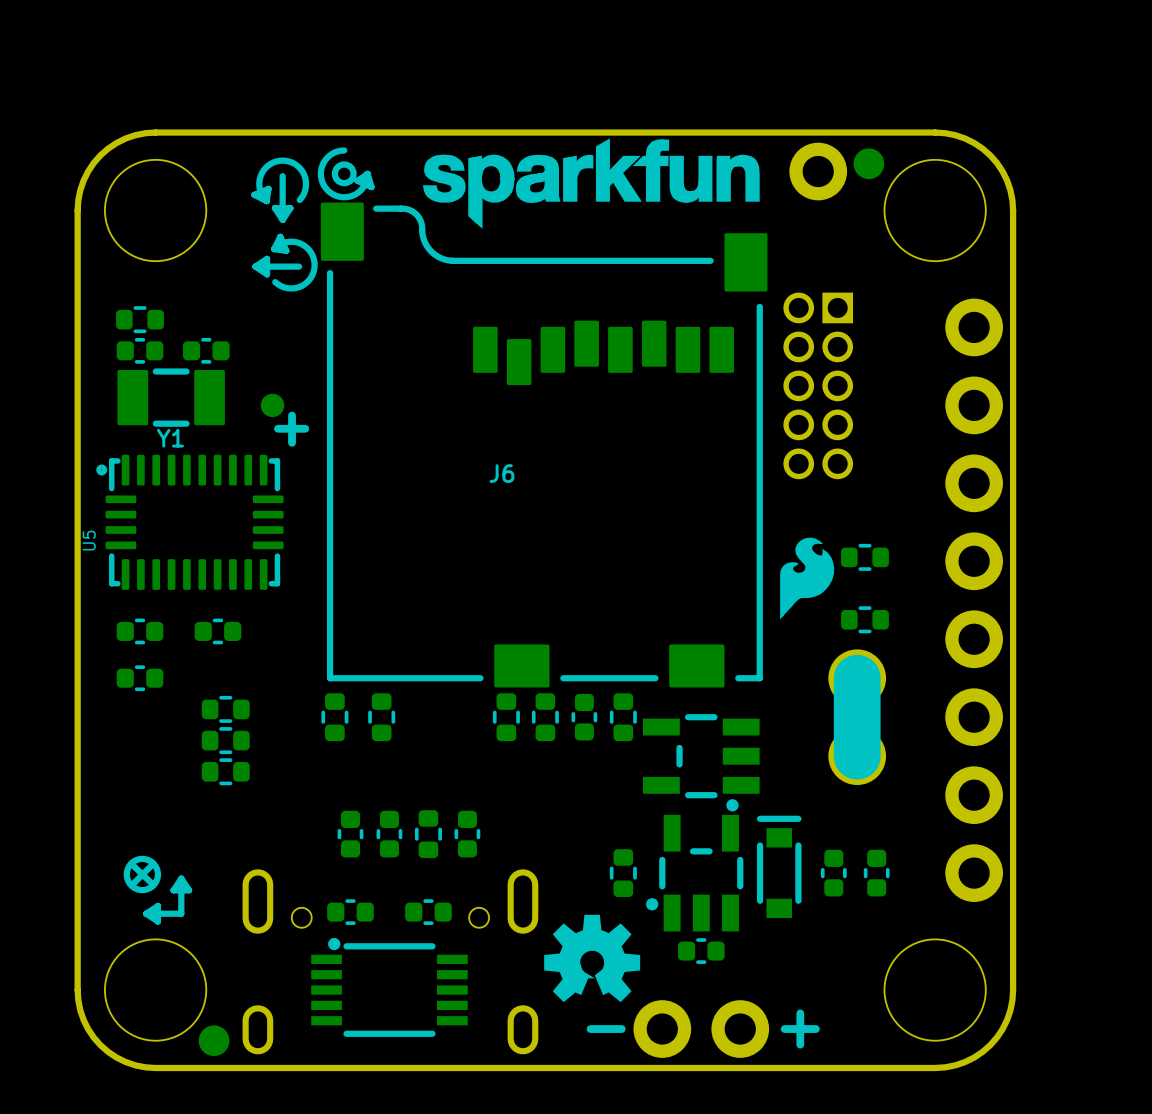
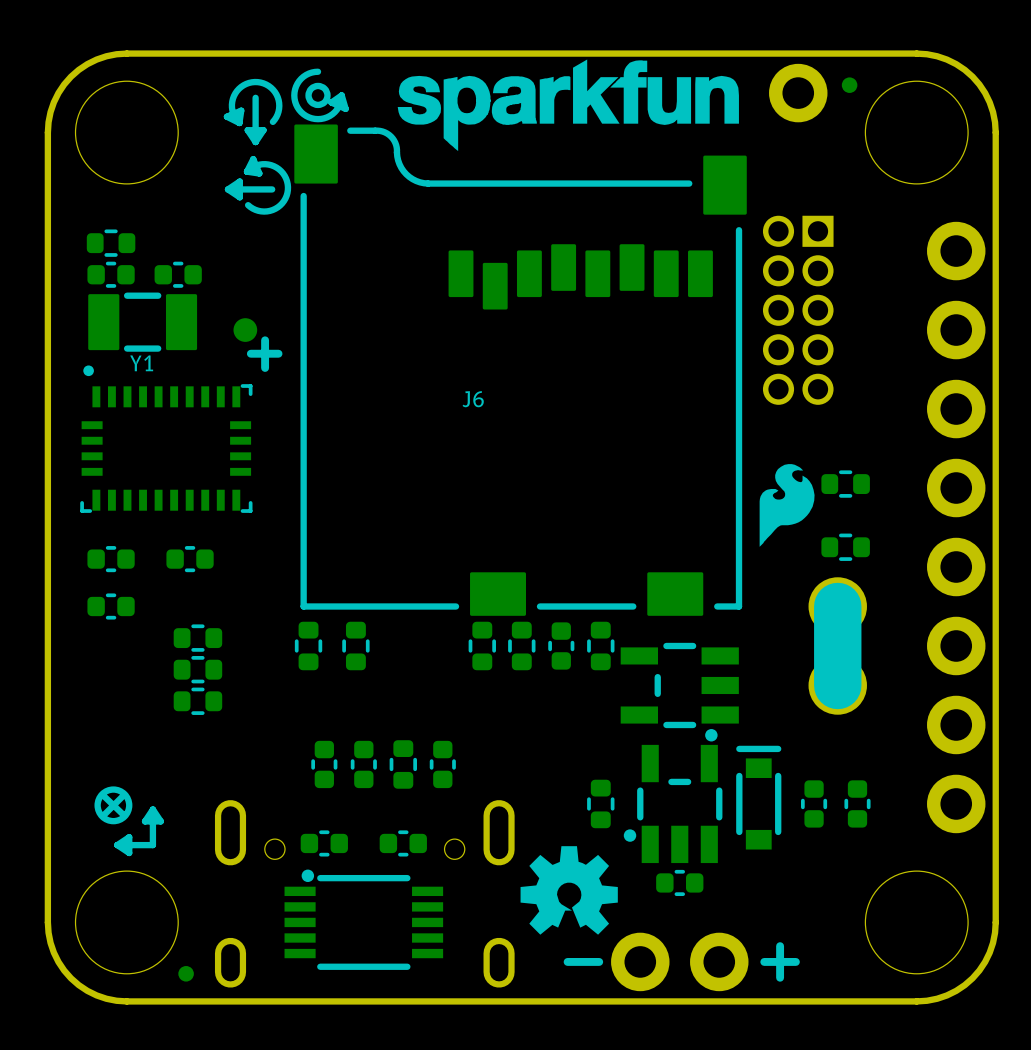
part footprint: [853, 148, 885, 180] -> [841, 77, 858, 93]
part: none -> (166, 439)
U5: (189, 522) -> none
part footprint: [198, 1025, 230, 1057] -> [178, 966, 194, 982]

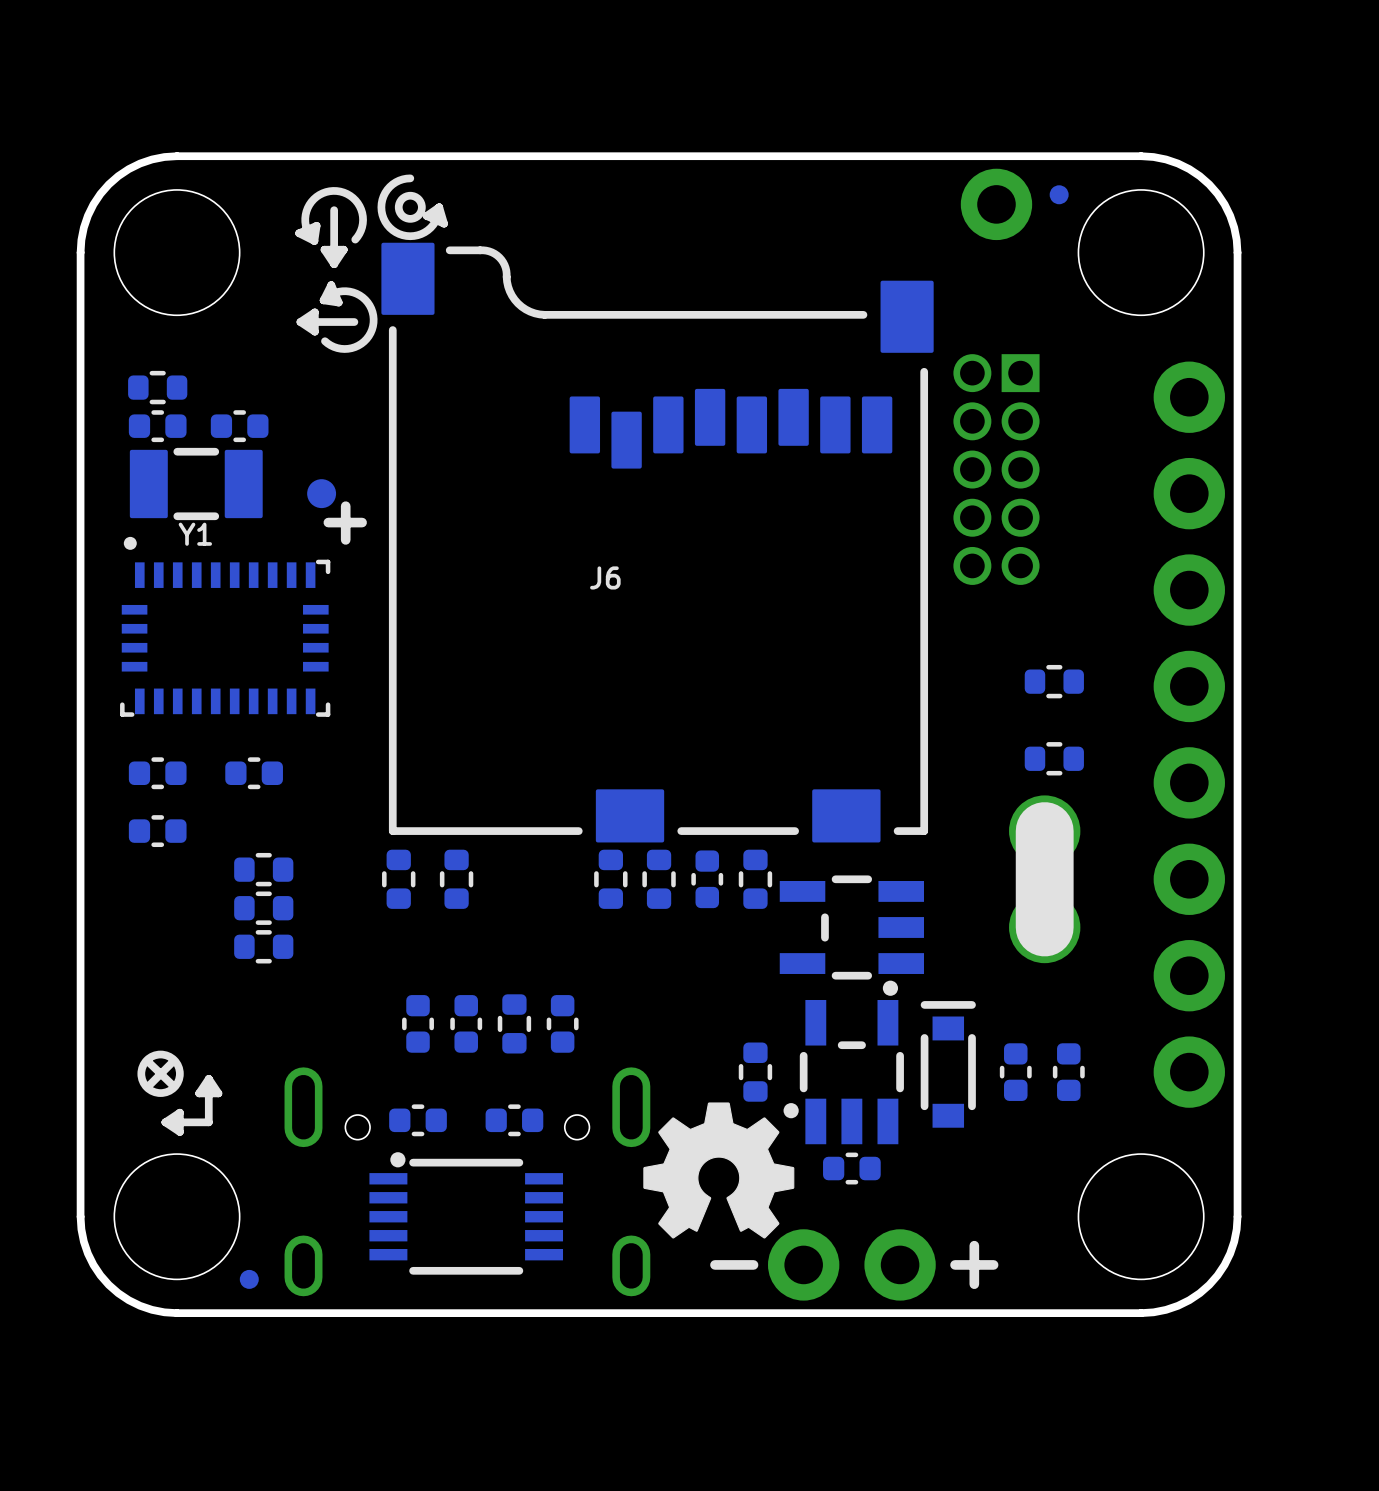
drawing: [397, 59, 739, 152] -> none
drawing: [759, 464, 815, 547] -> none
drawing shape: [520, 846, 618, 935] -> [643, 1102, 795, 1239]

